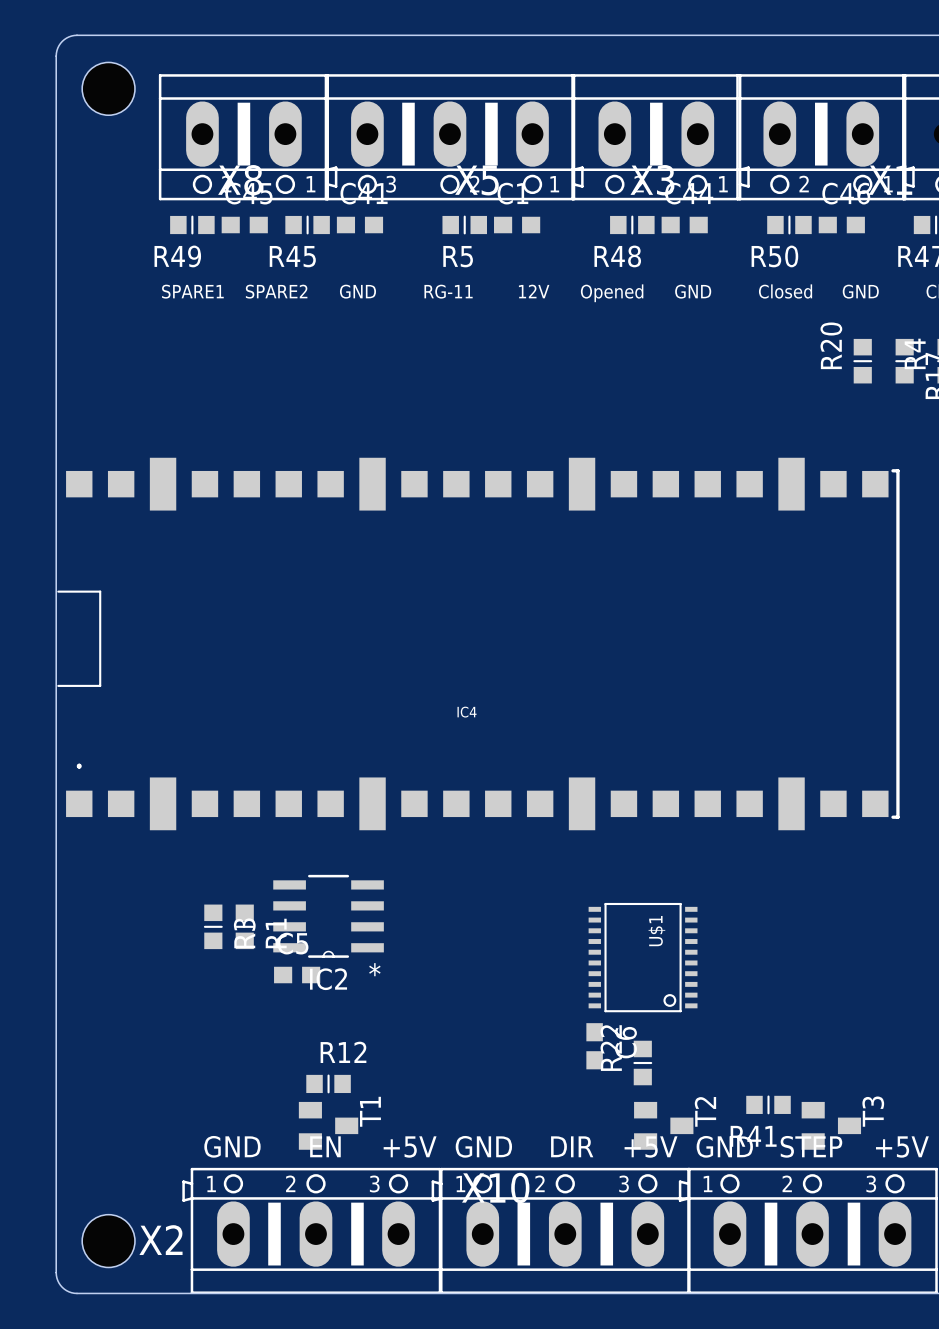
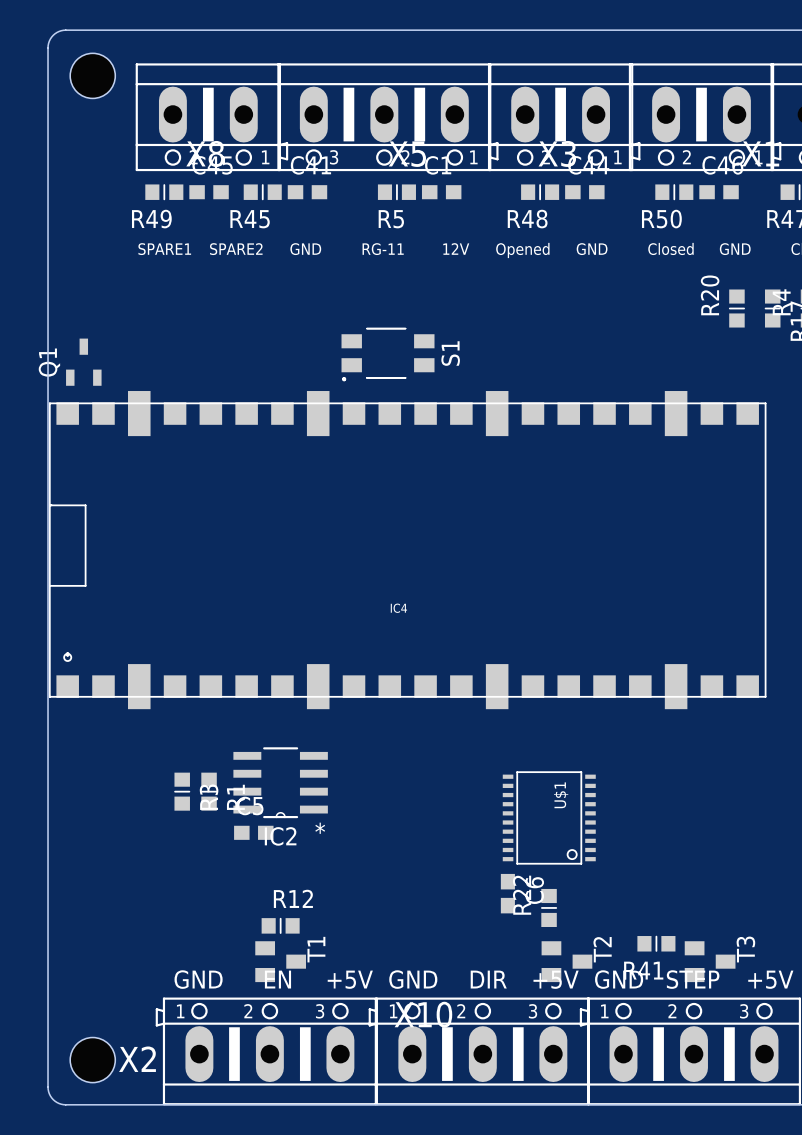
S1: none -> (388, 354)
Q1: none -> (83, 362)
IC4 footprint: [57, 457, 900, 831] -> [48, 391, 767, 710]

